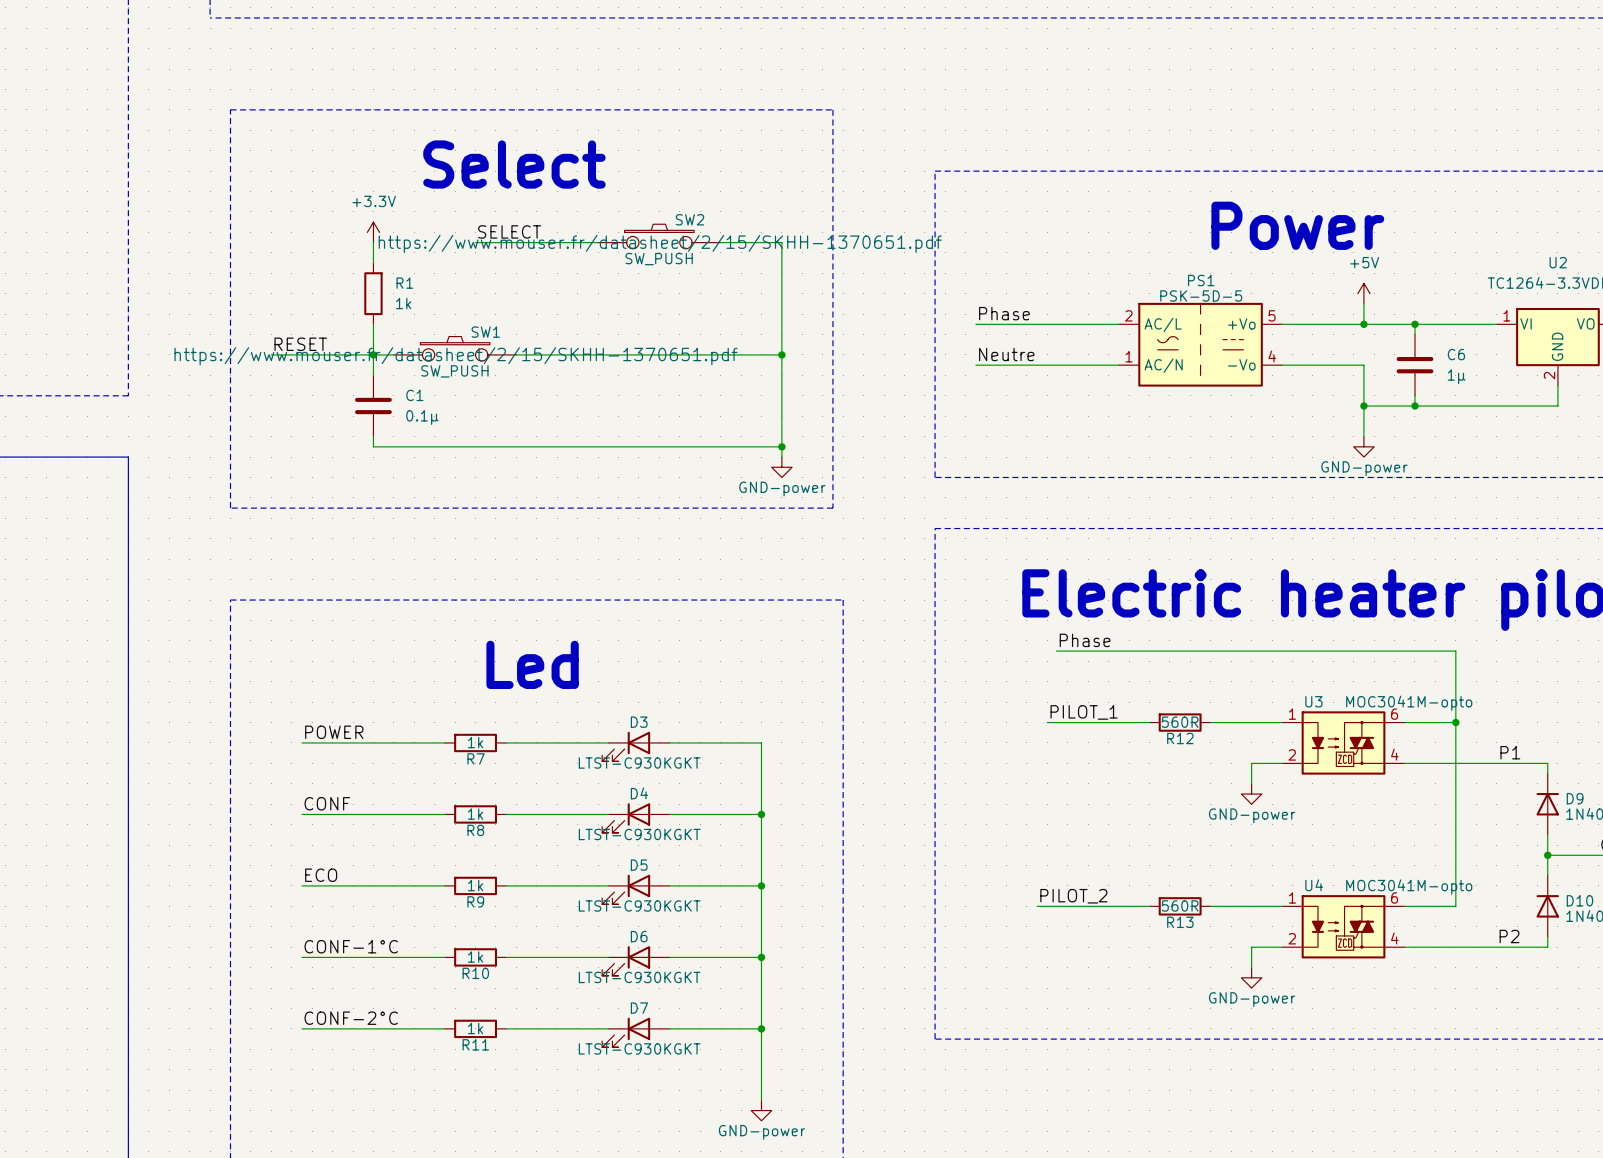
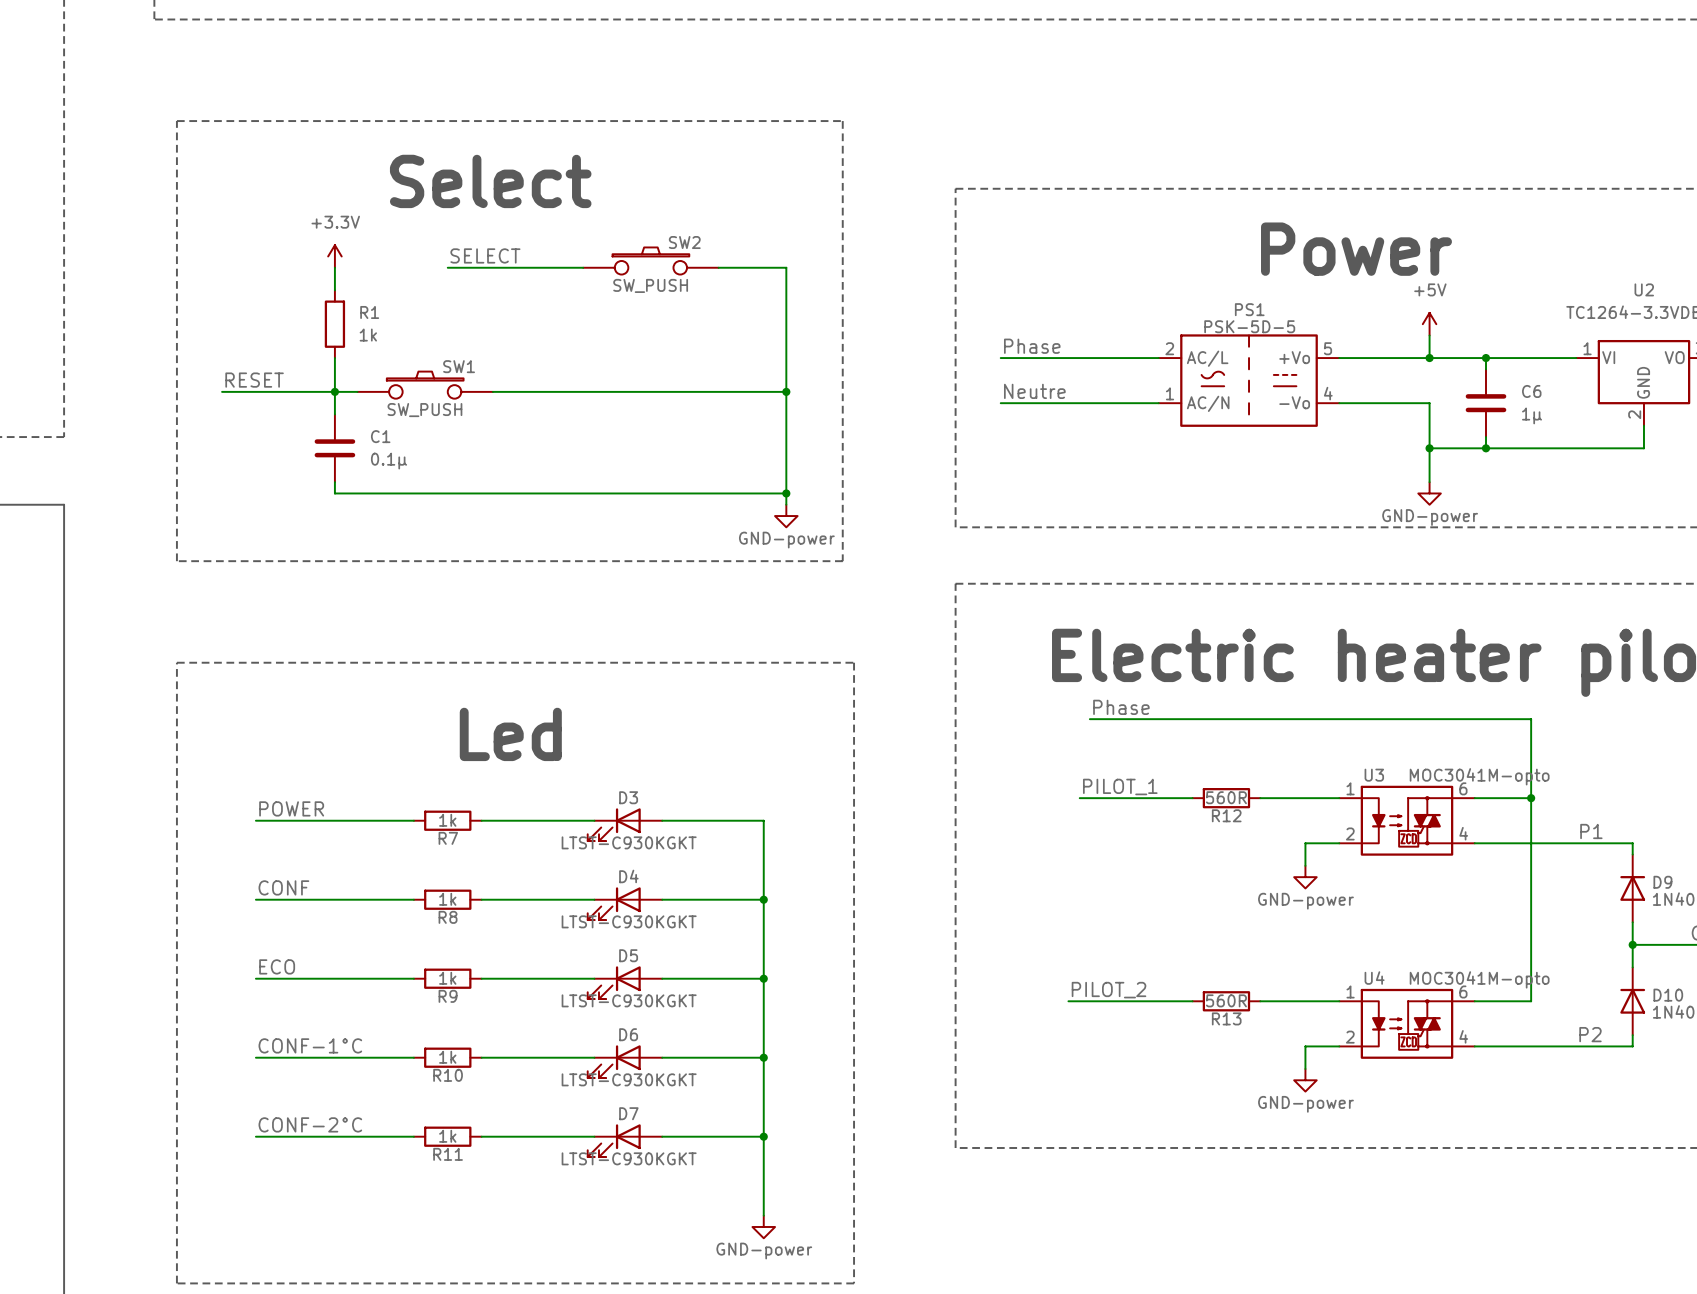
SW2 text: https://www.mouser.fr/datasheet/2/15/SKHH-1370651.pdf (660, 243) -> none
SW1 text: https://www.mouser.fr/datasheet/2/15/SKHH-1370651.pdf (456, 356) -> none

